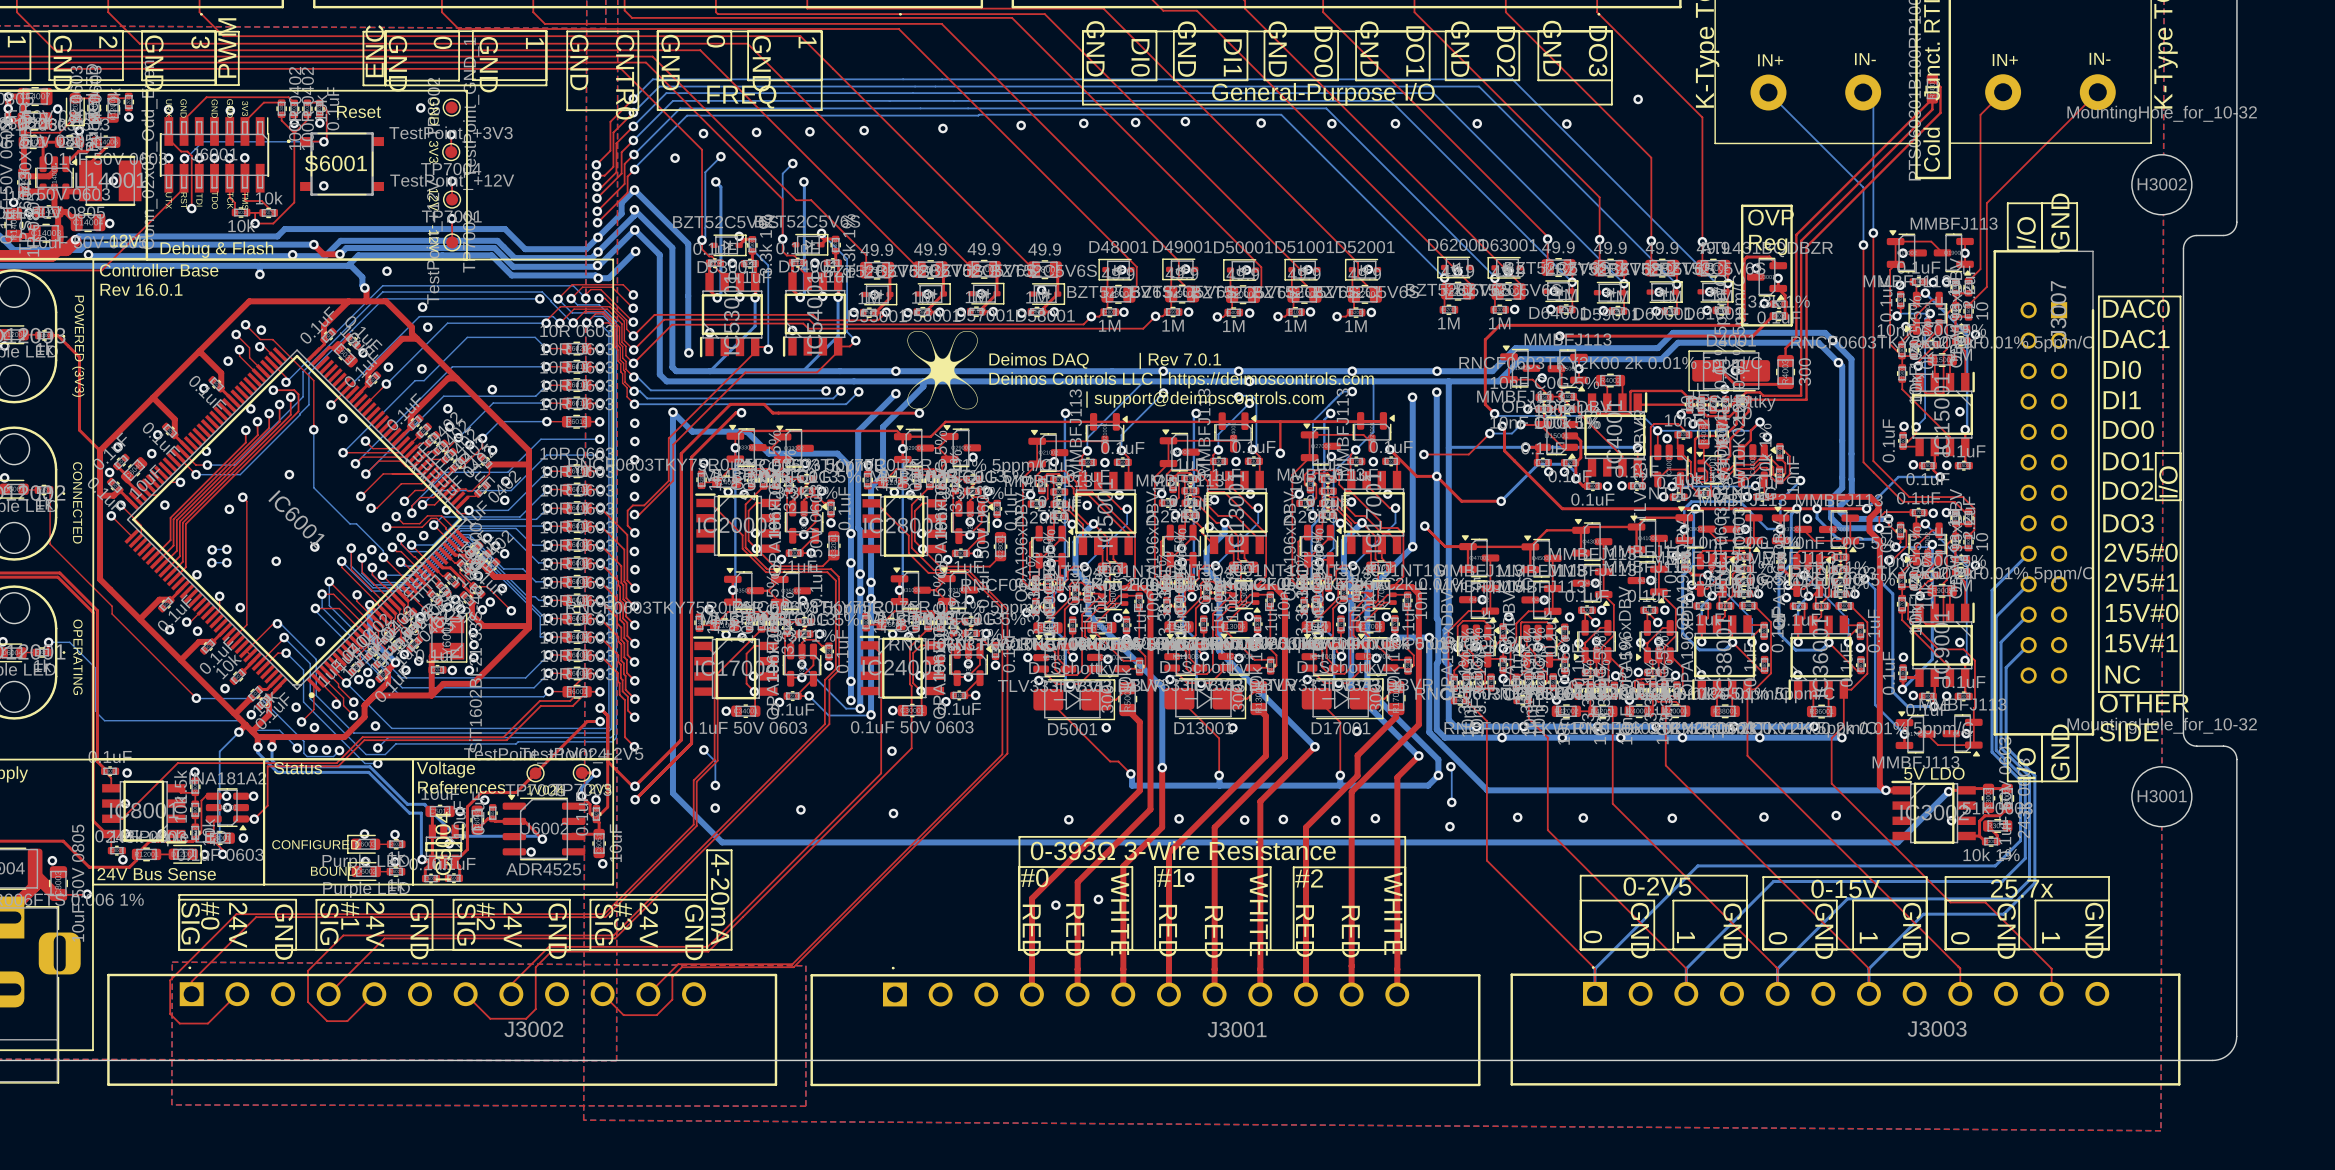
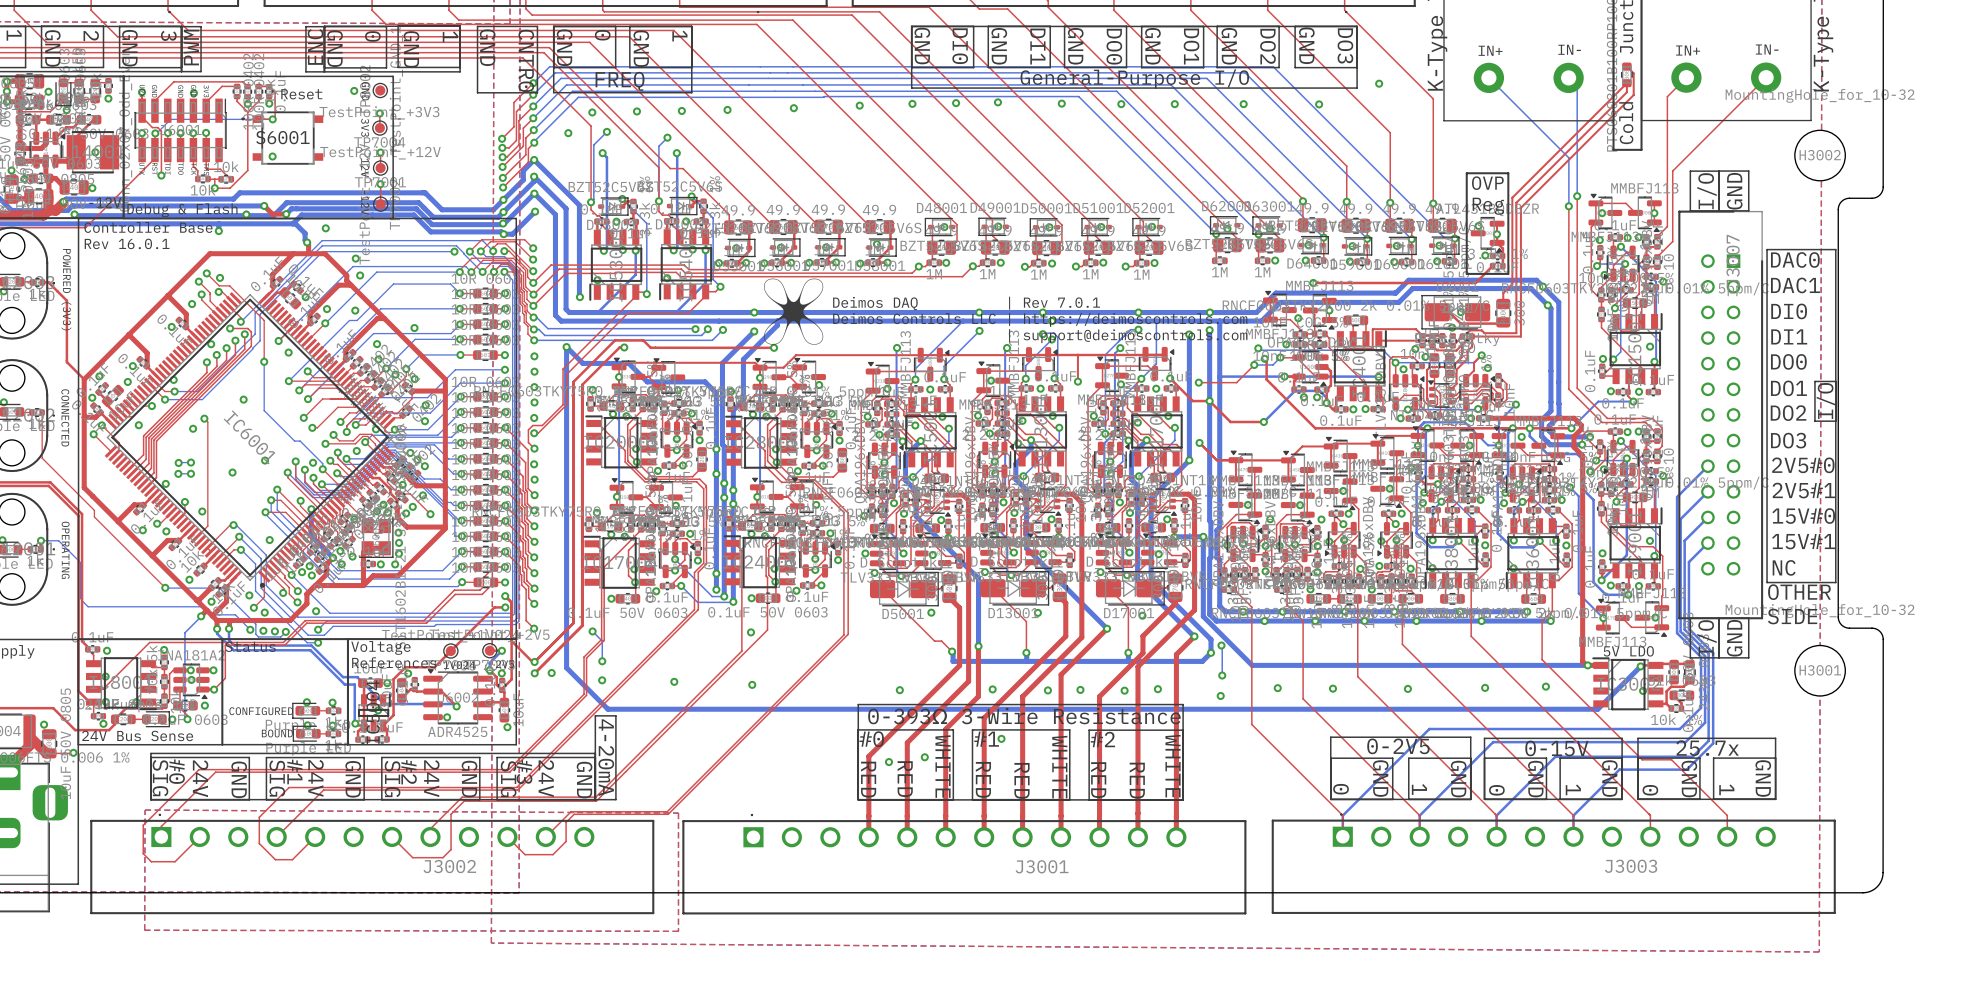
top track: (1778, 265) (1769, 257) (1746, 257) (1744, 259) (1744, 320) (1739, 325) (1499, 325) (1485, 339) (1485, 404) (1494, 413) -> (1496, 223) (1496, 234)

